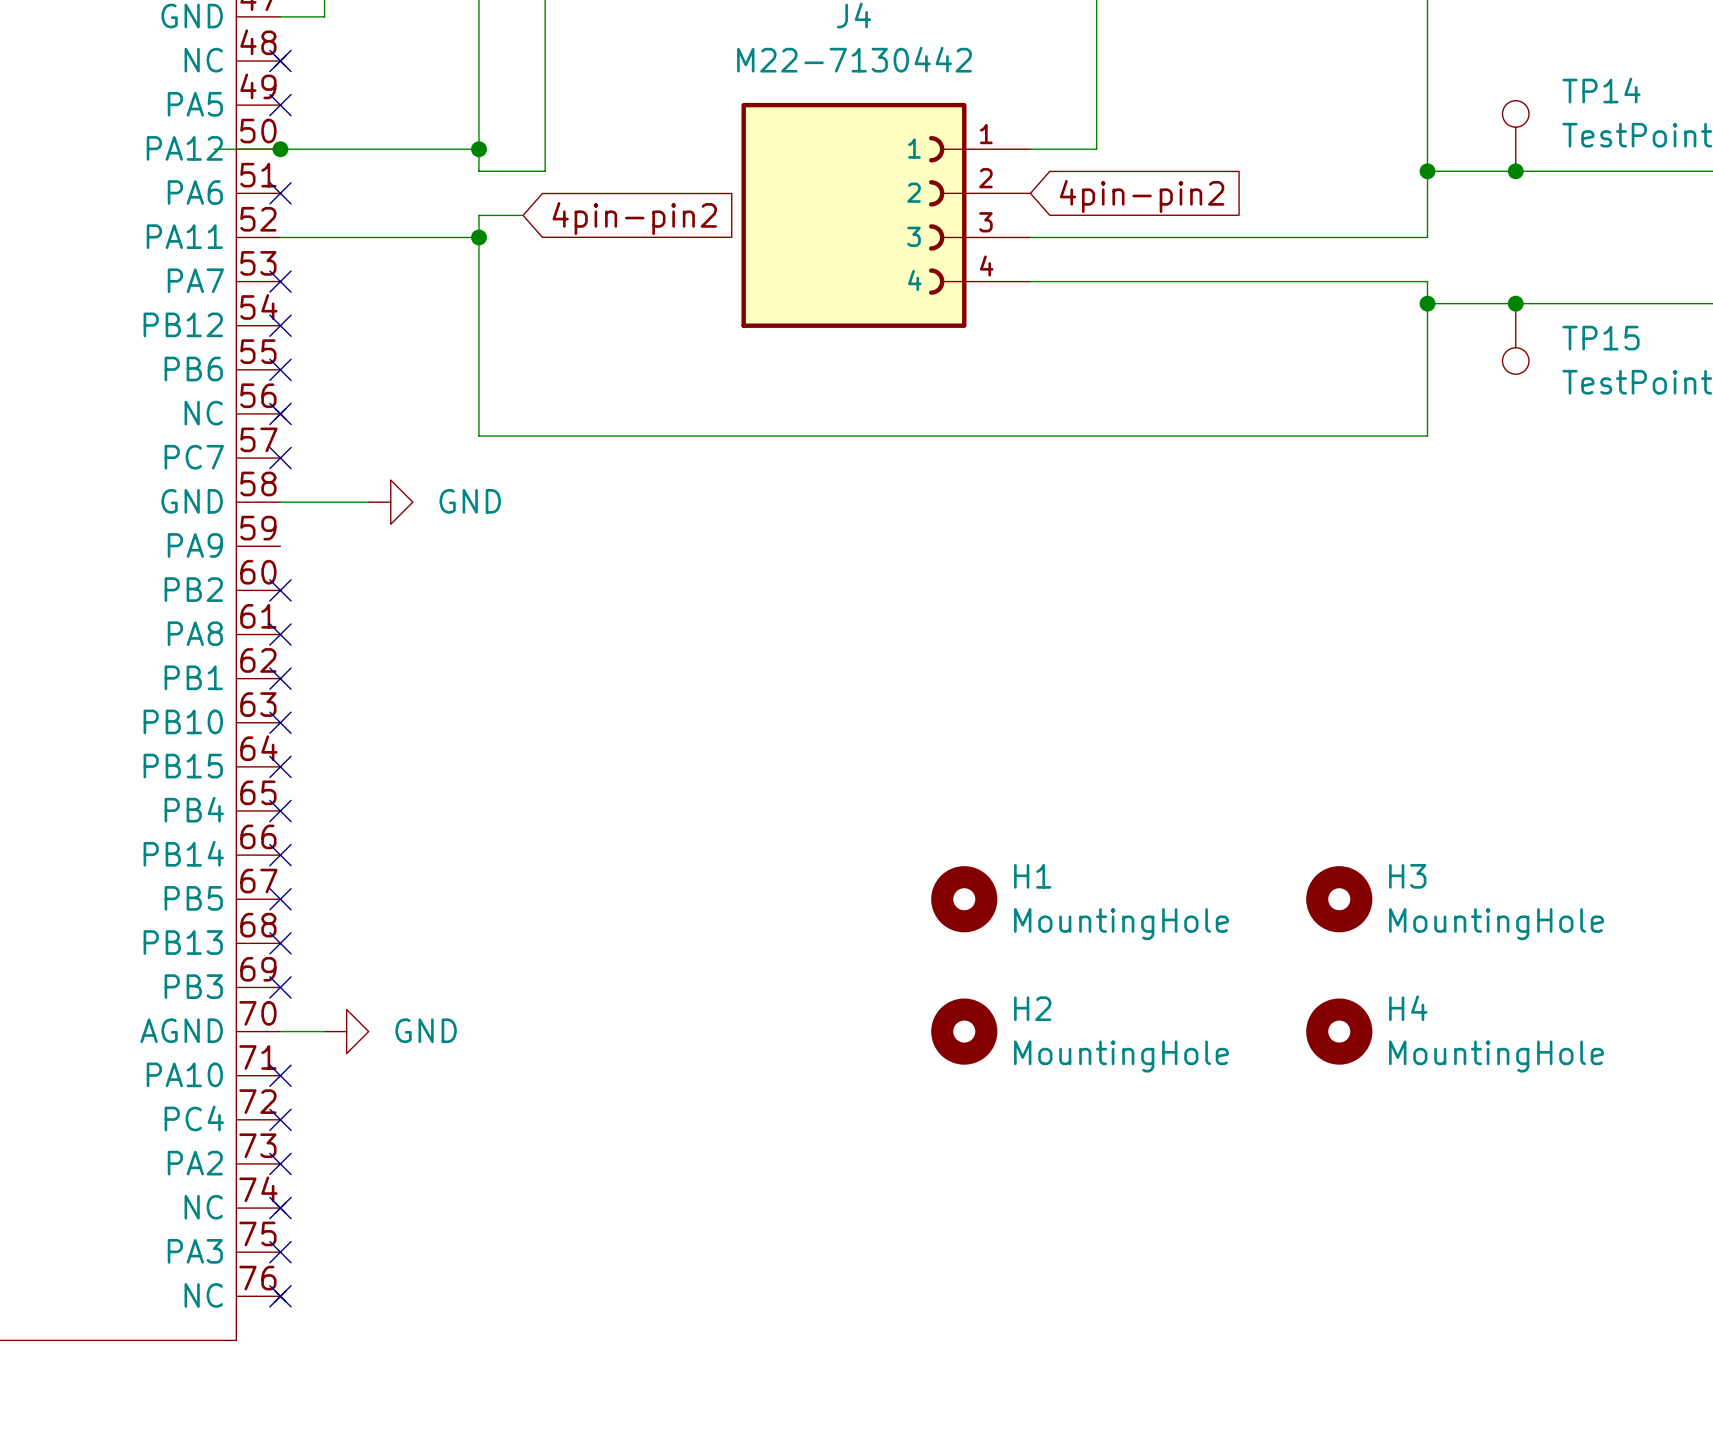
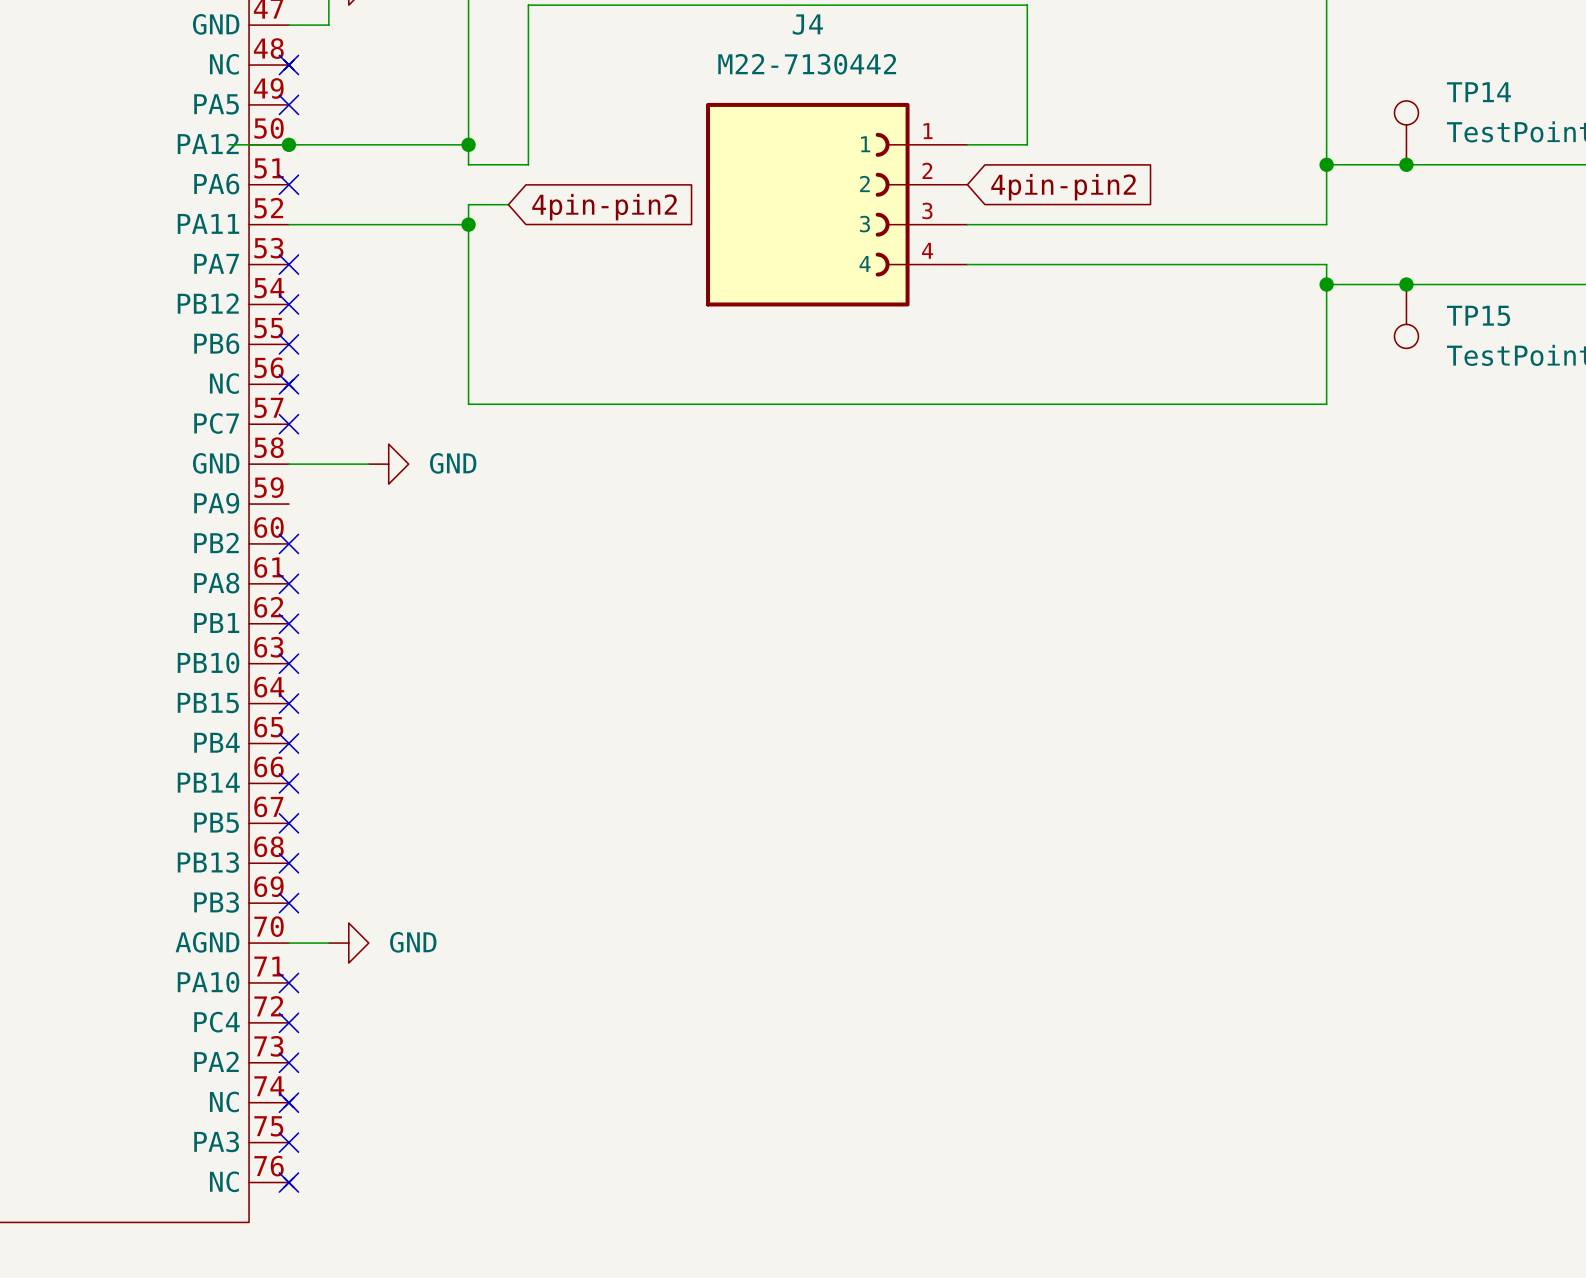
H1: MountingHole (964, 899) -> none
H3: MountingHole (1339, 899) -> none
H2: MountingHole (964, 1031) -> none
H4: MountingHole (1339, 1031) -> none

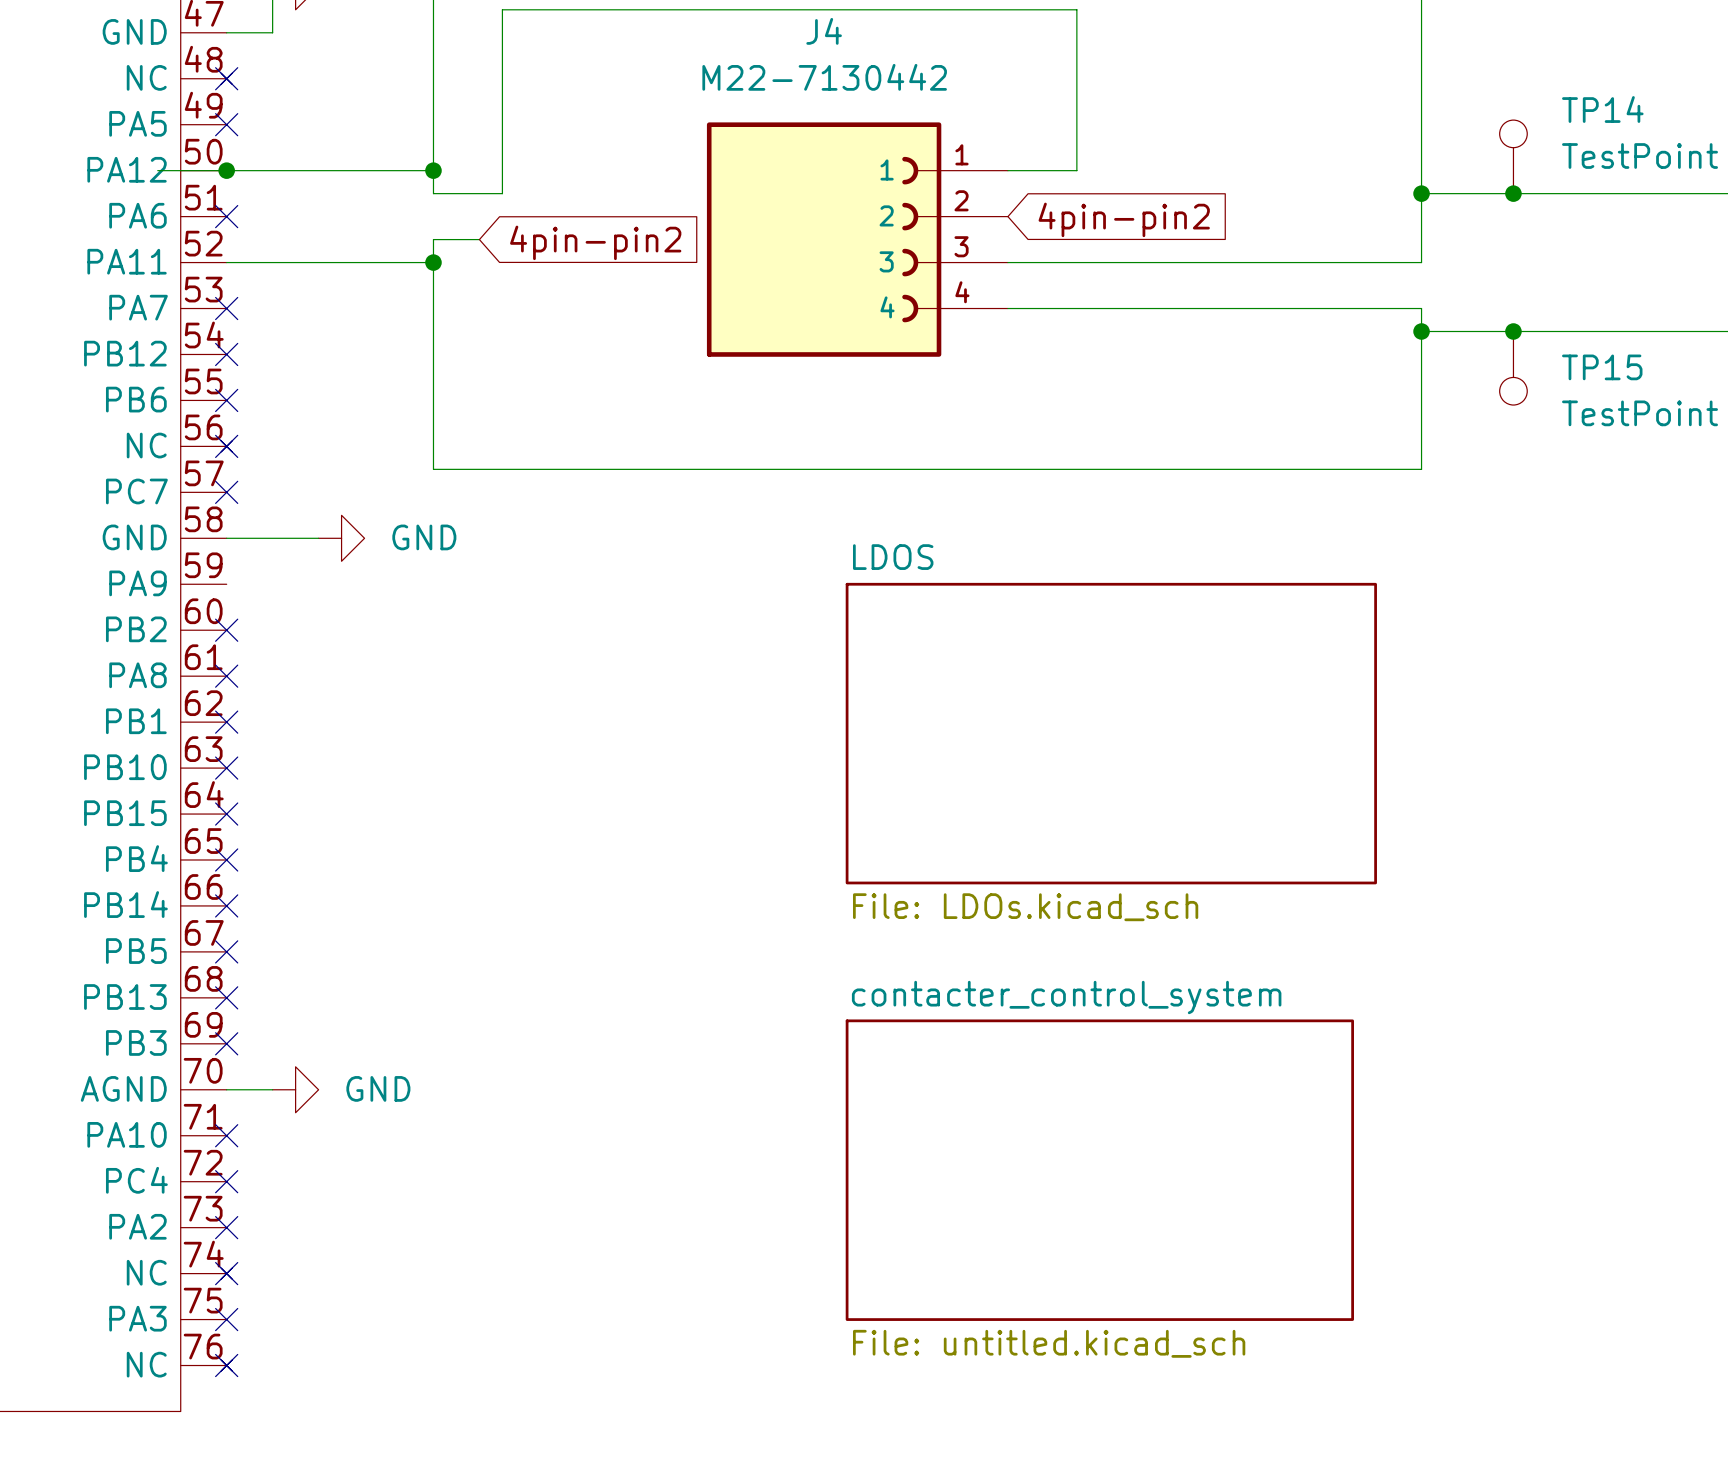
sheet LDOS: none -> File: LDOs.kicad_sch (1111, 733)
sheet contacter_control_system: none -> File: untitled.kicad_sch (1099, 1170)

